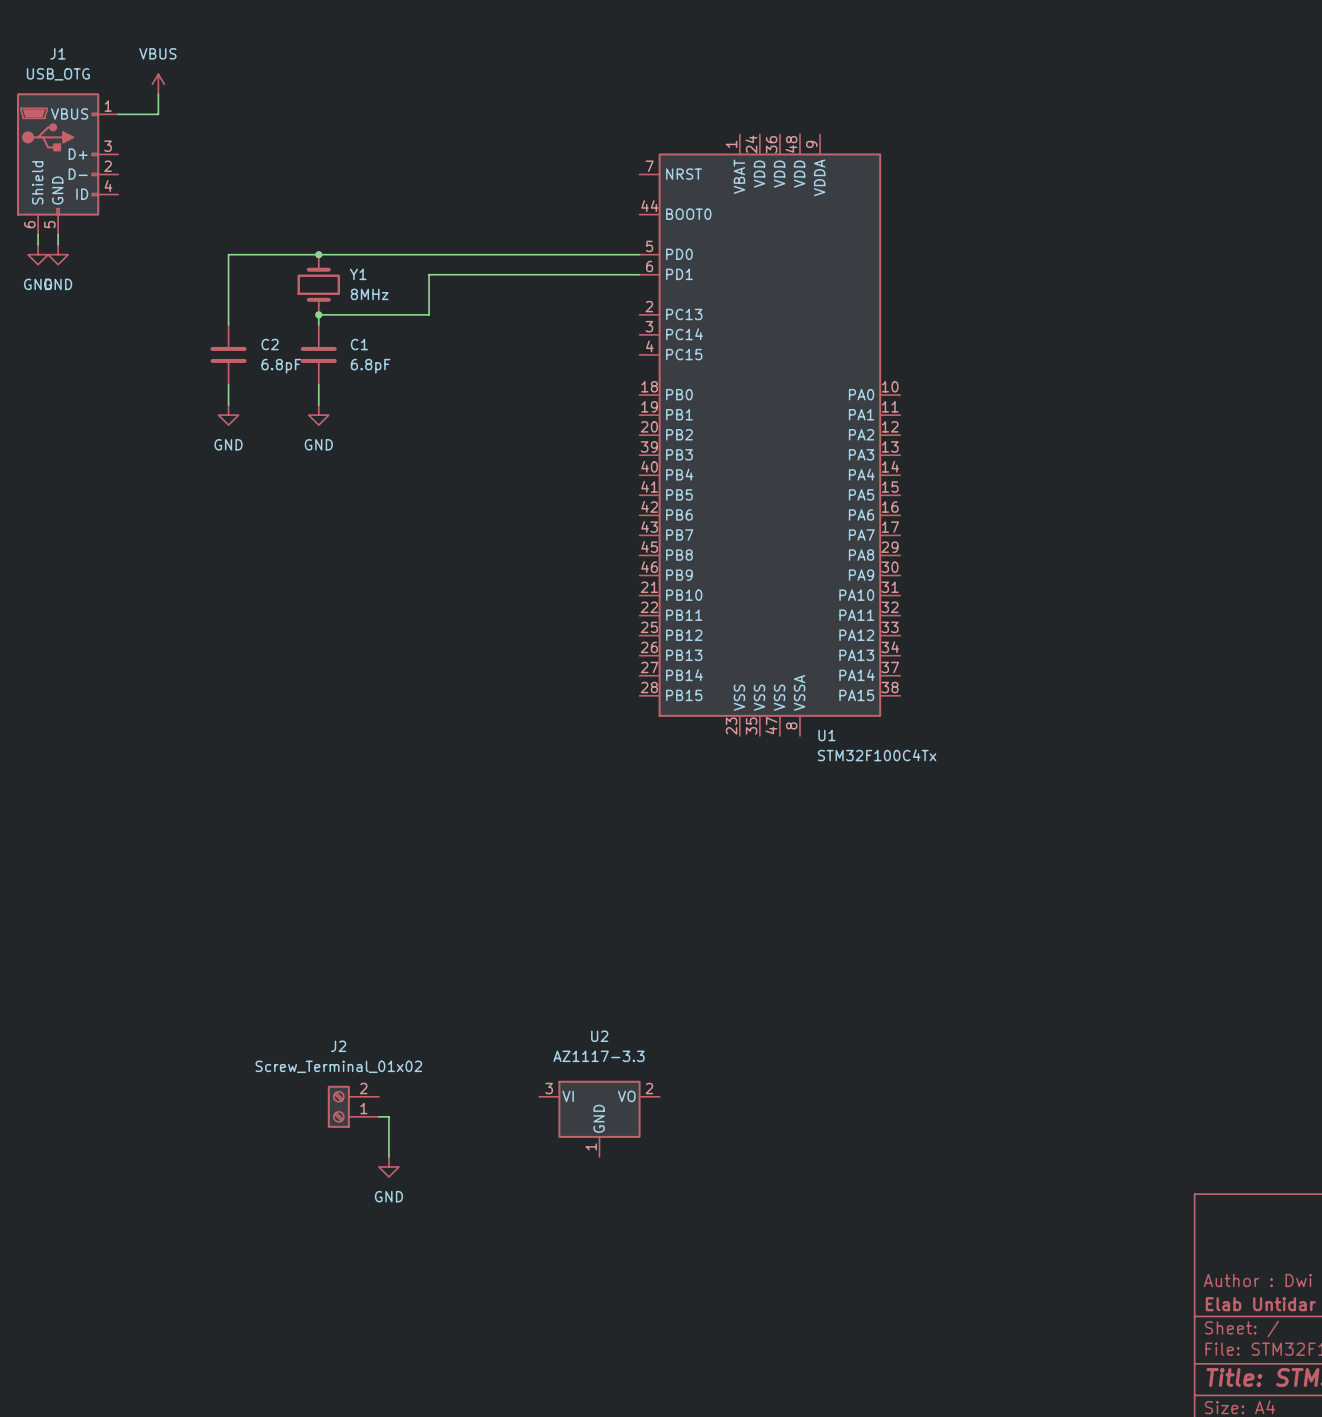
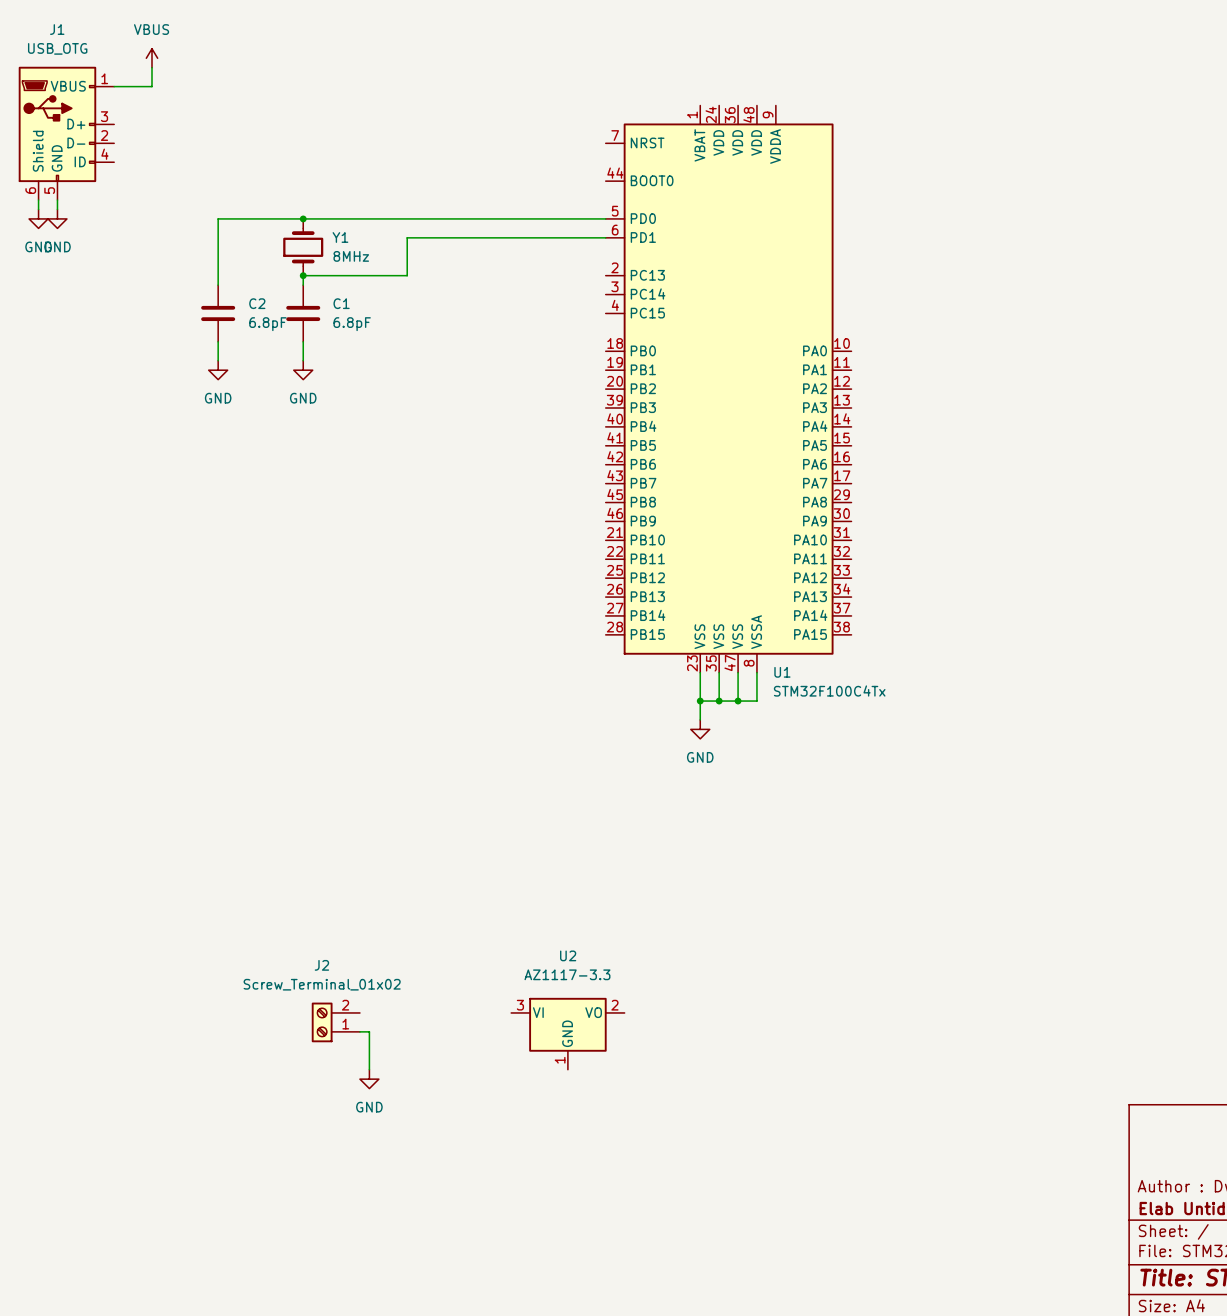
wire: none -> (700, 672) (700, 719)
wire: none -> (719, 672) (719, 701)
wire: none -> (738, 672) (738, 701)
wire: none -> (756, 672) (756, 701) (700, 701)
junction: none -> (700, 701)
junction: none -> (719, 701)
junction: none -> (738, 701)
power symbol: none -> GND (700, 729)

